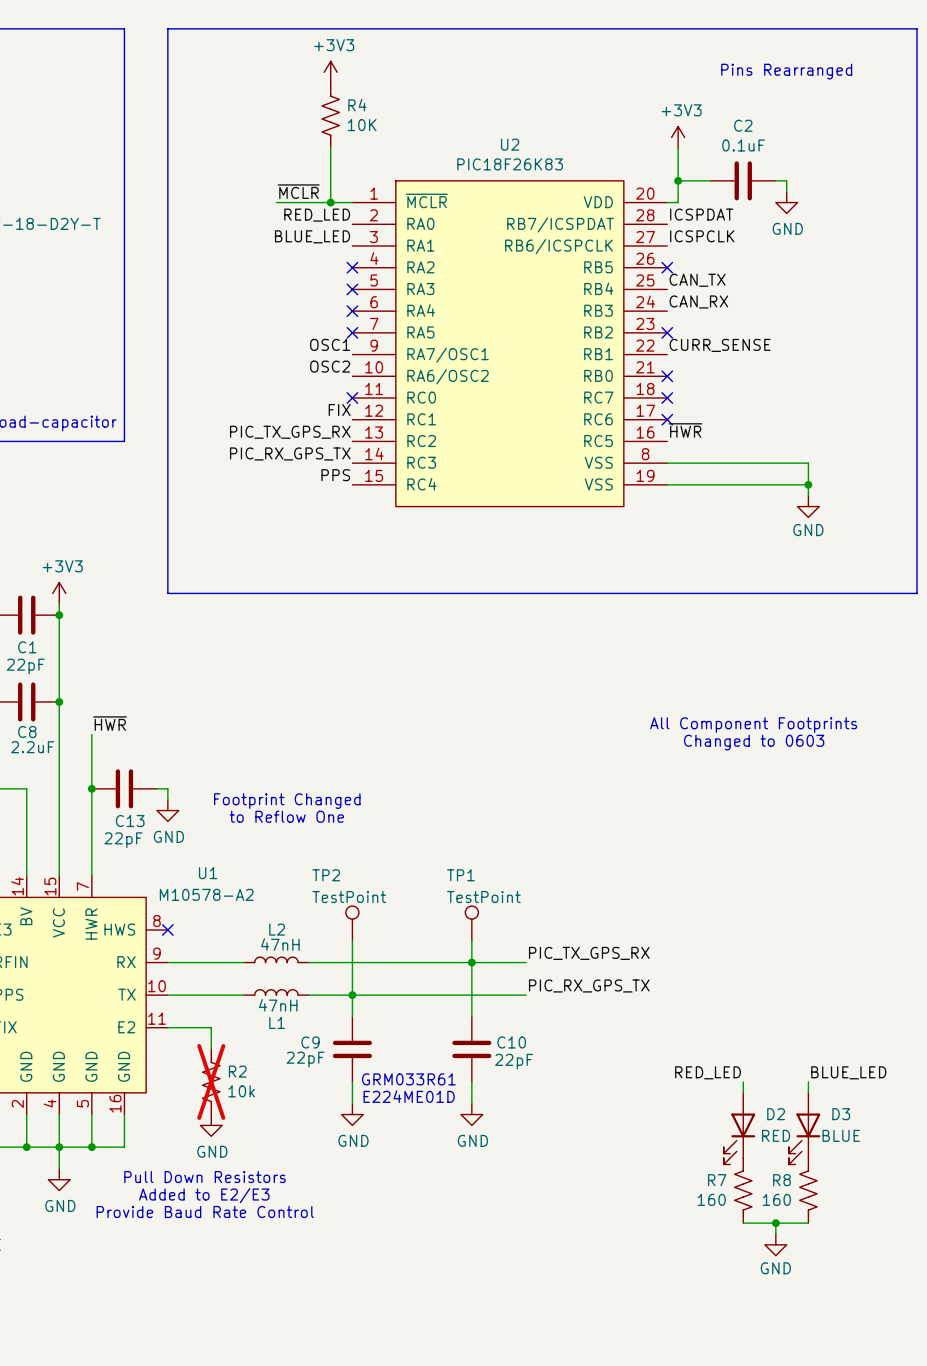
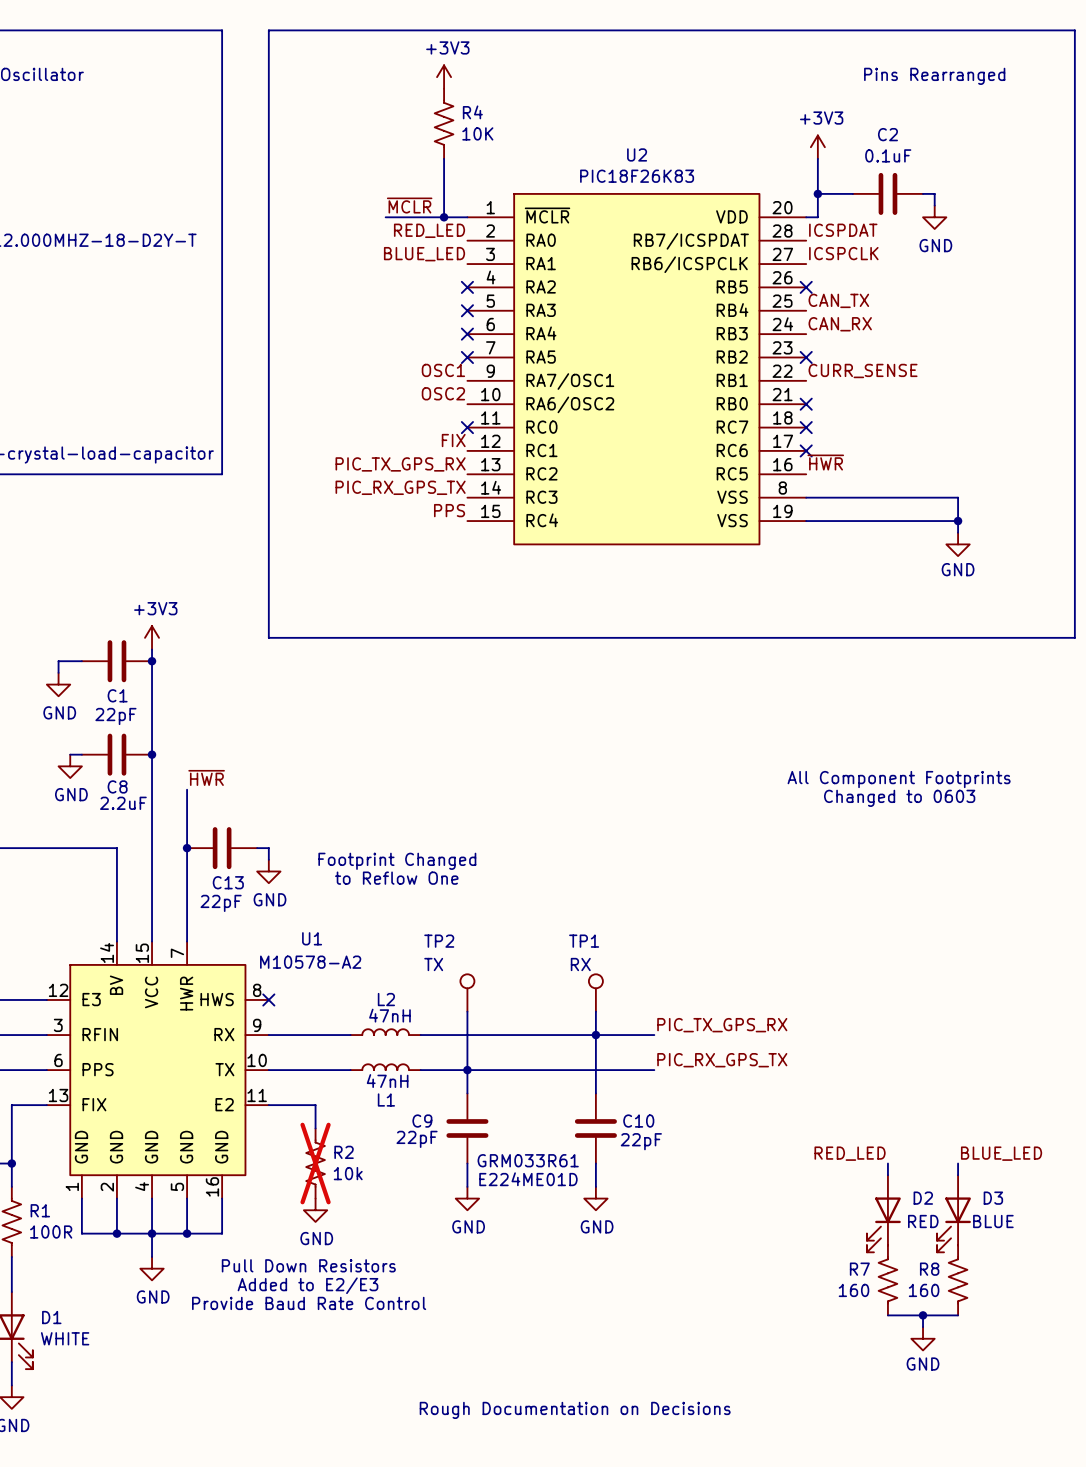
TP2 value: TestPoint (349, 897) -> TX (433, 964)
TP1 value: TestPoint (483, 897) -> RX (580, 964)
text: none -> Rough Documentation on Decisions (575, 1410)

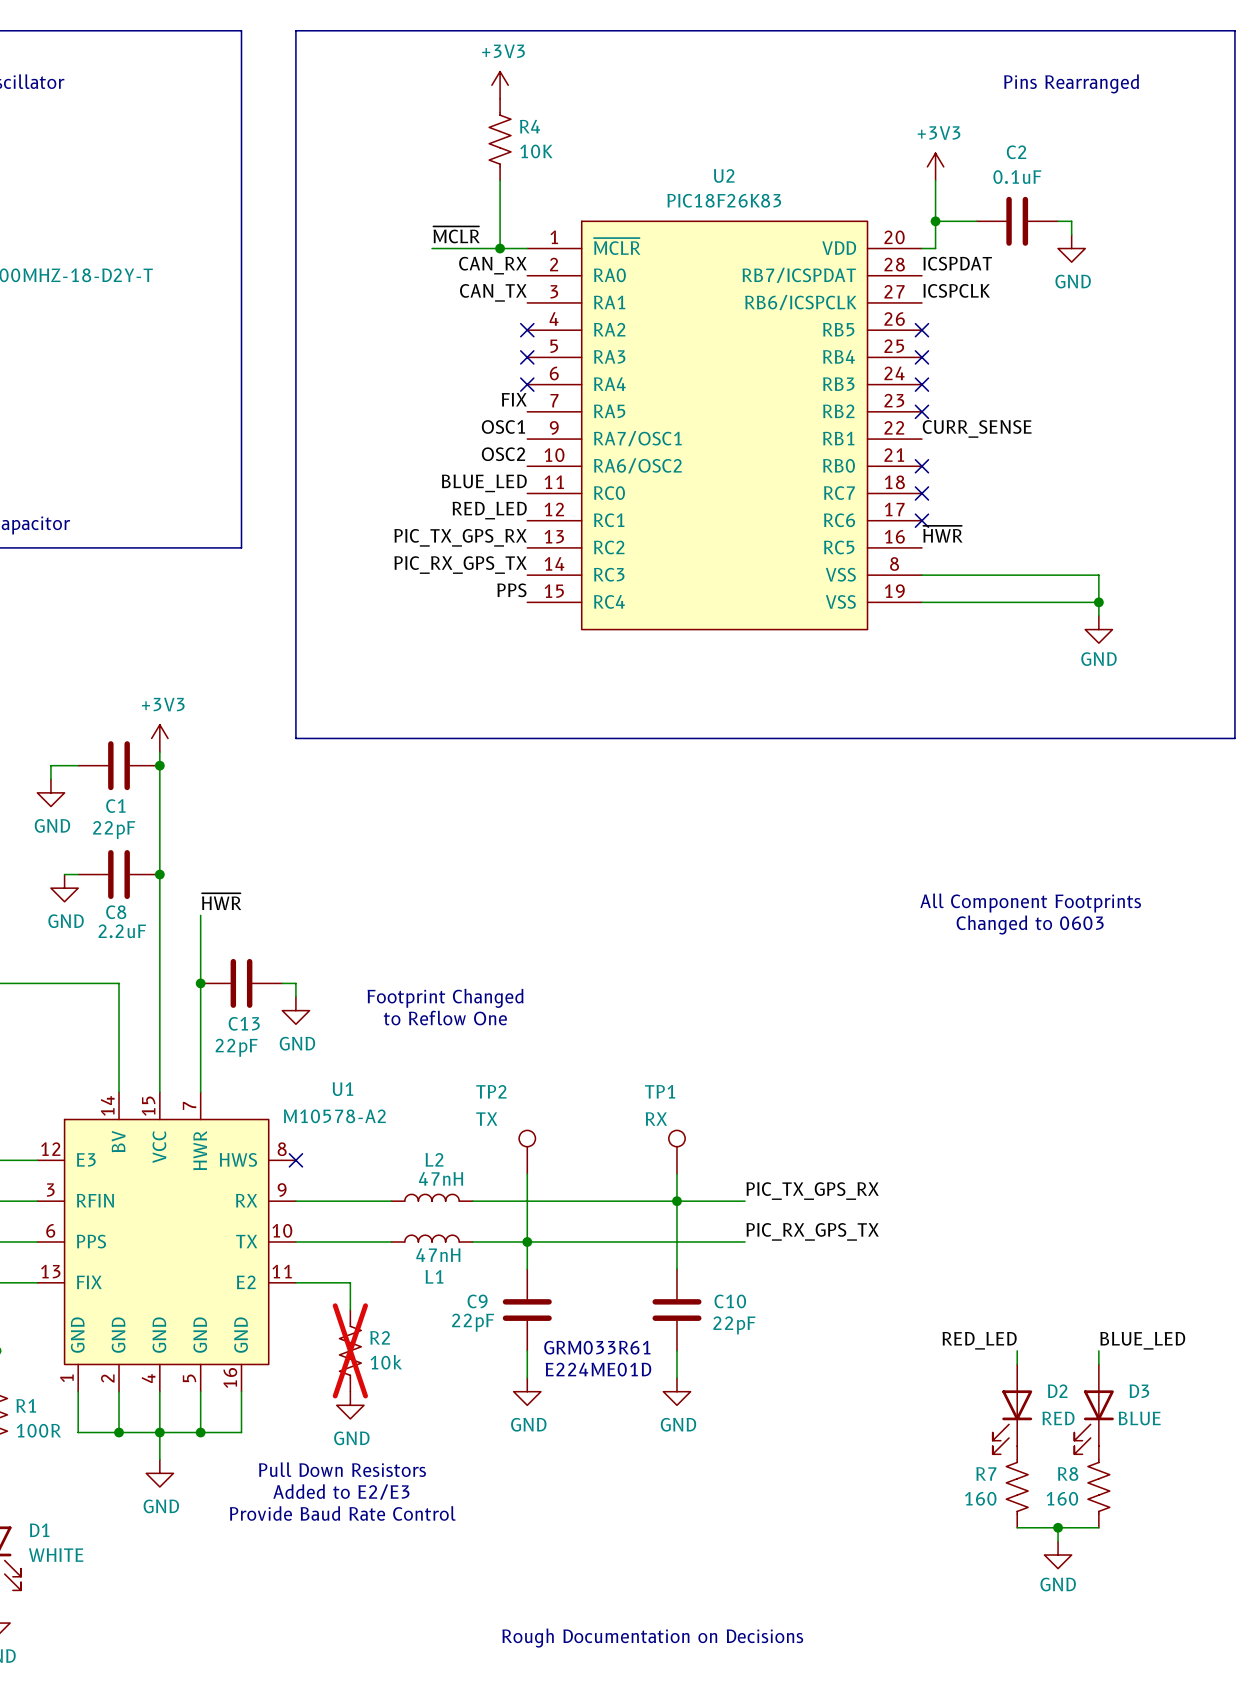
label: RED_LED (429, 230) -> CAN_RX (492, 265)
label: BLUE_LED (424, 254) -> CAN_TX (493, 292)
label: CAN_TX (838, 300) -> none
no-connect mark: none -> (921, 357)
label: CAN_RX (840, 324) -> none
no-connect mark: none -> (921, 384)
label: none -> FIX (514, 399)
no-connect mark: (467, 357) -> none
label: none -> BLUE_LED (484, 483)
no-connect mark: (467, 427) -> none
label: FIX (453, 440) -> RED_LED (489, 510)

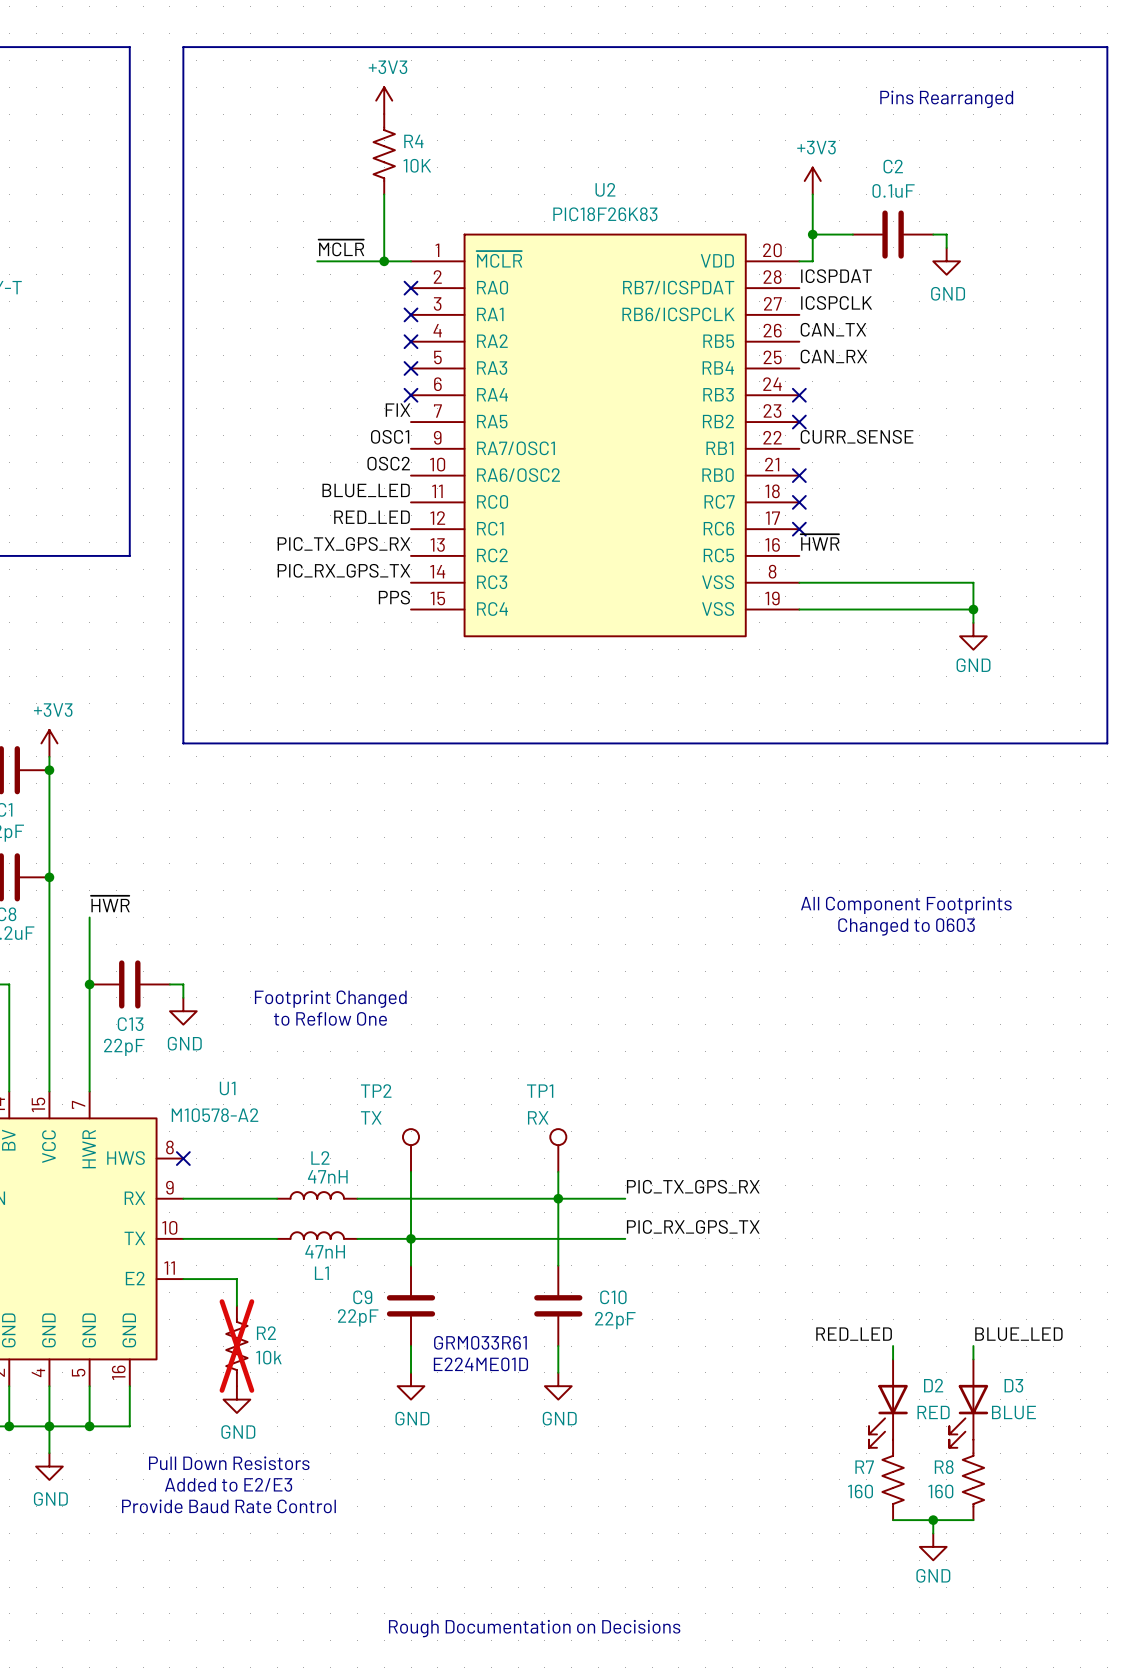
label: CAN_RX (492, 265) -> none
no-connect mark: none -> (411, 288)
label: CAN_TX (493, 292) -> none
no-connect mark: none -> (411, 314)
label: none -> CAN_TX (833, 329)
no-connect mark: (921, 330) -> none
label: none -> CAN_RX (833, 356)
no-connect mark: (921, 357) -> none

